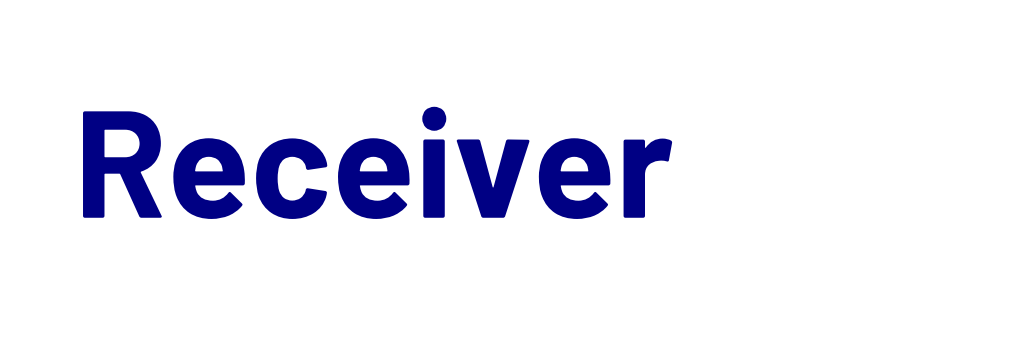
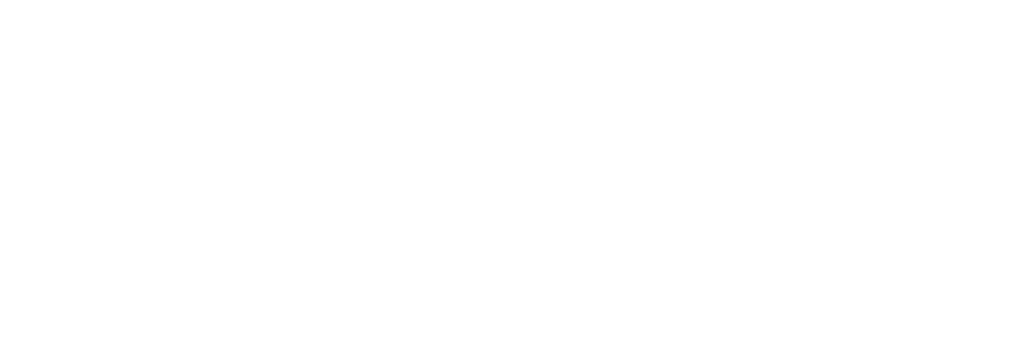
text: Receiver (377, 162) -> none

